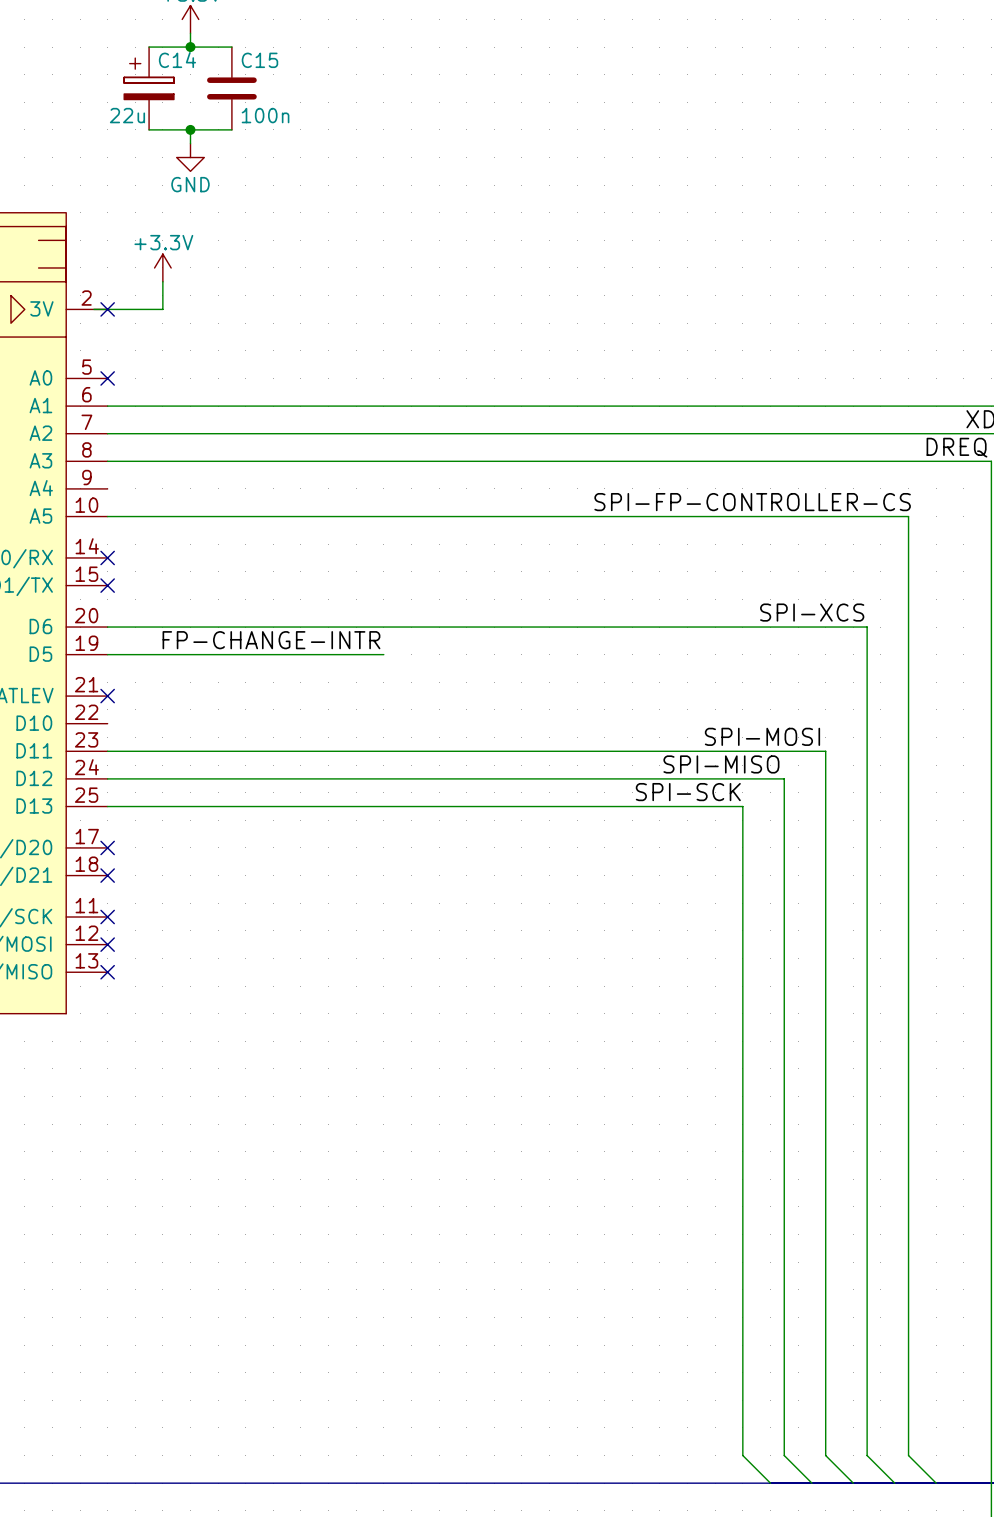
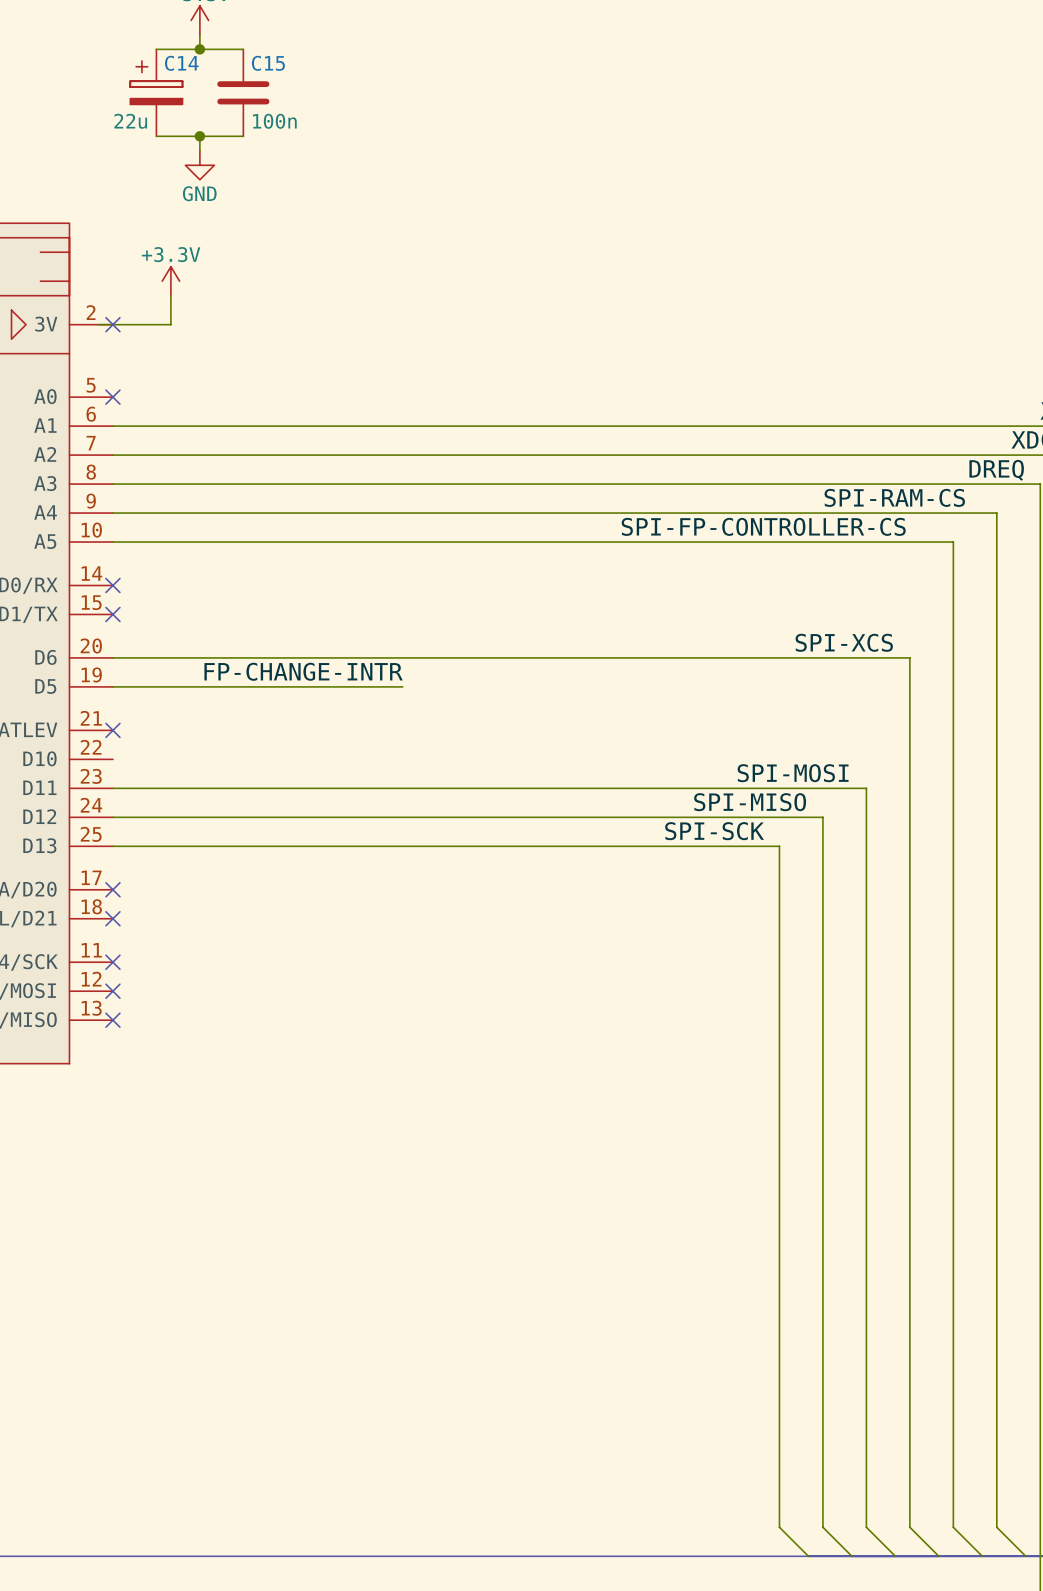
label: none -> SPI-RAM-CS (894, 497)
wire: none -> (112, 513) (996, 513) (996, 1527) (1025, 1556)

